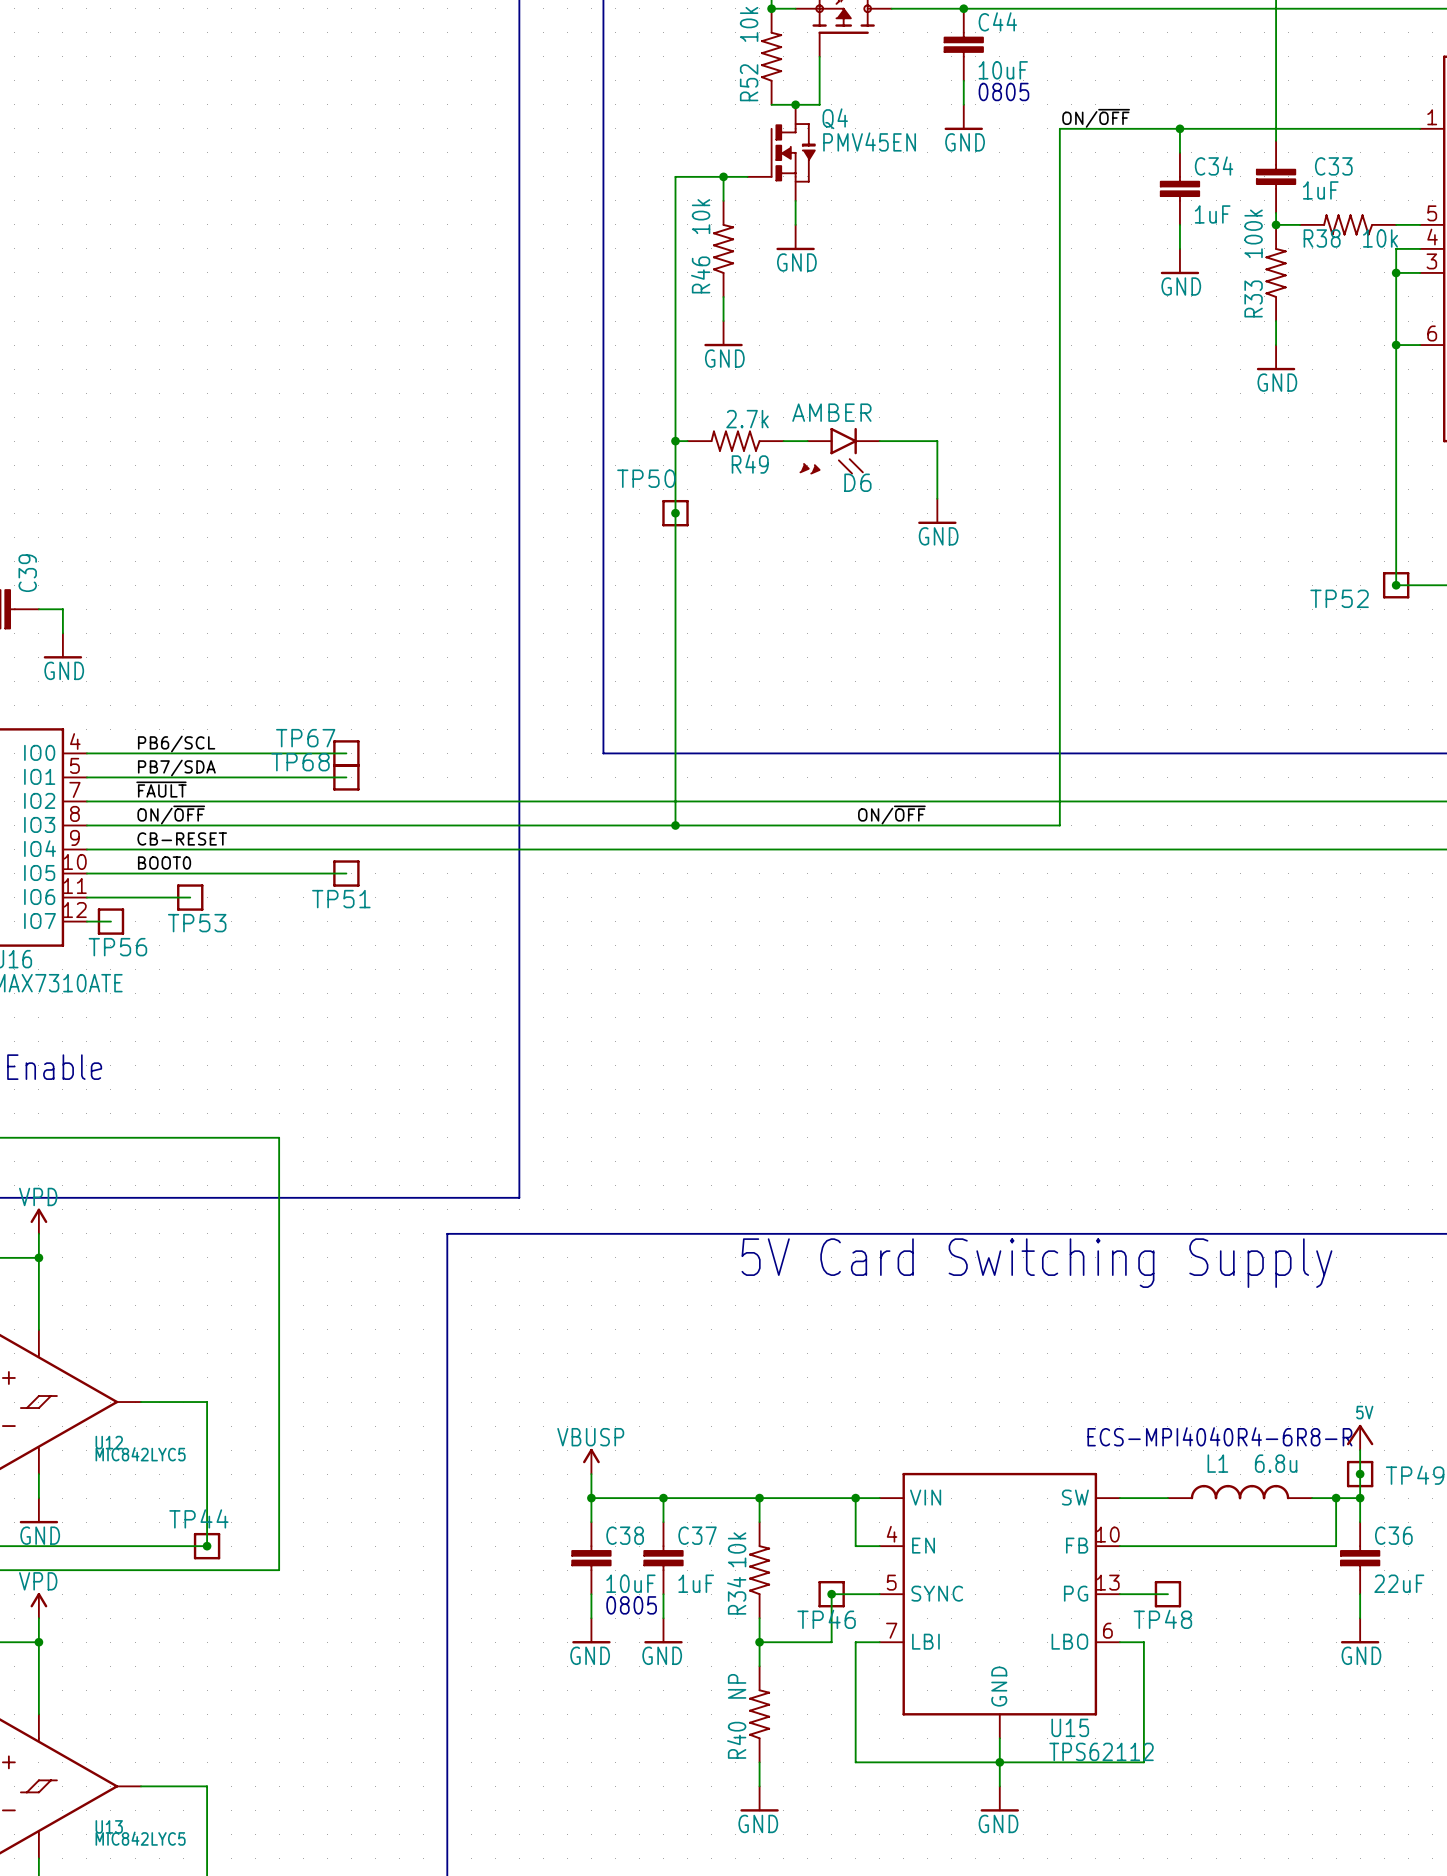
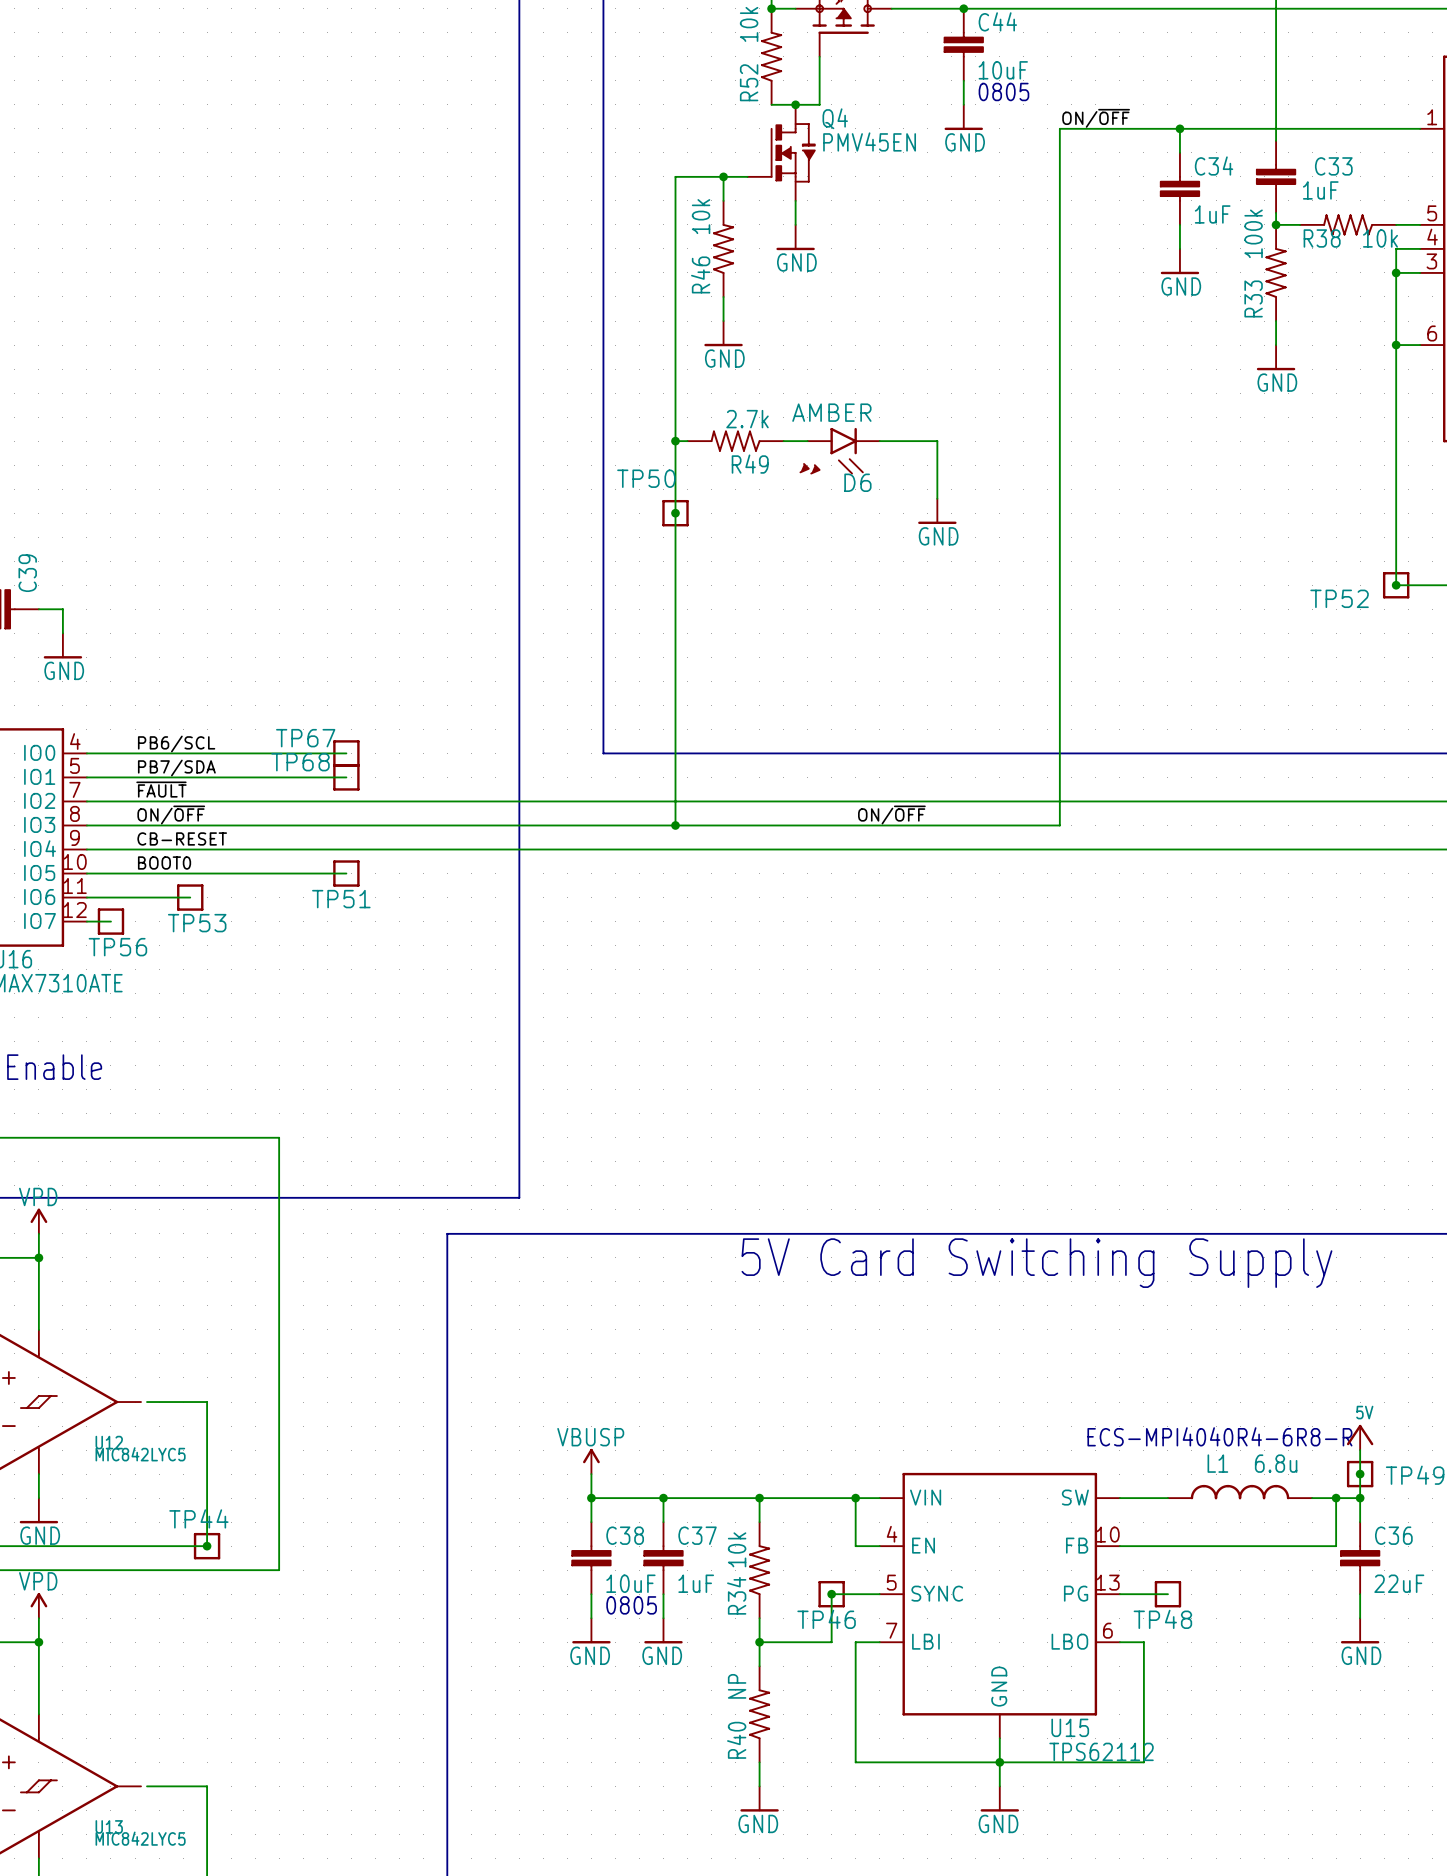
wire: (141, 1402) (147, 1402) -> none
wire: (141, 1786) (147, 1786) -> none

